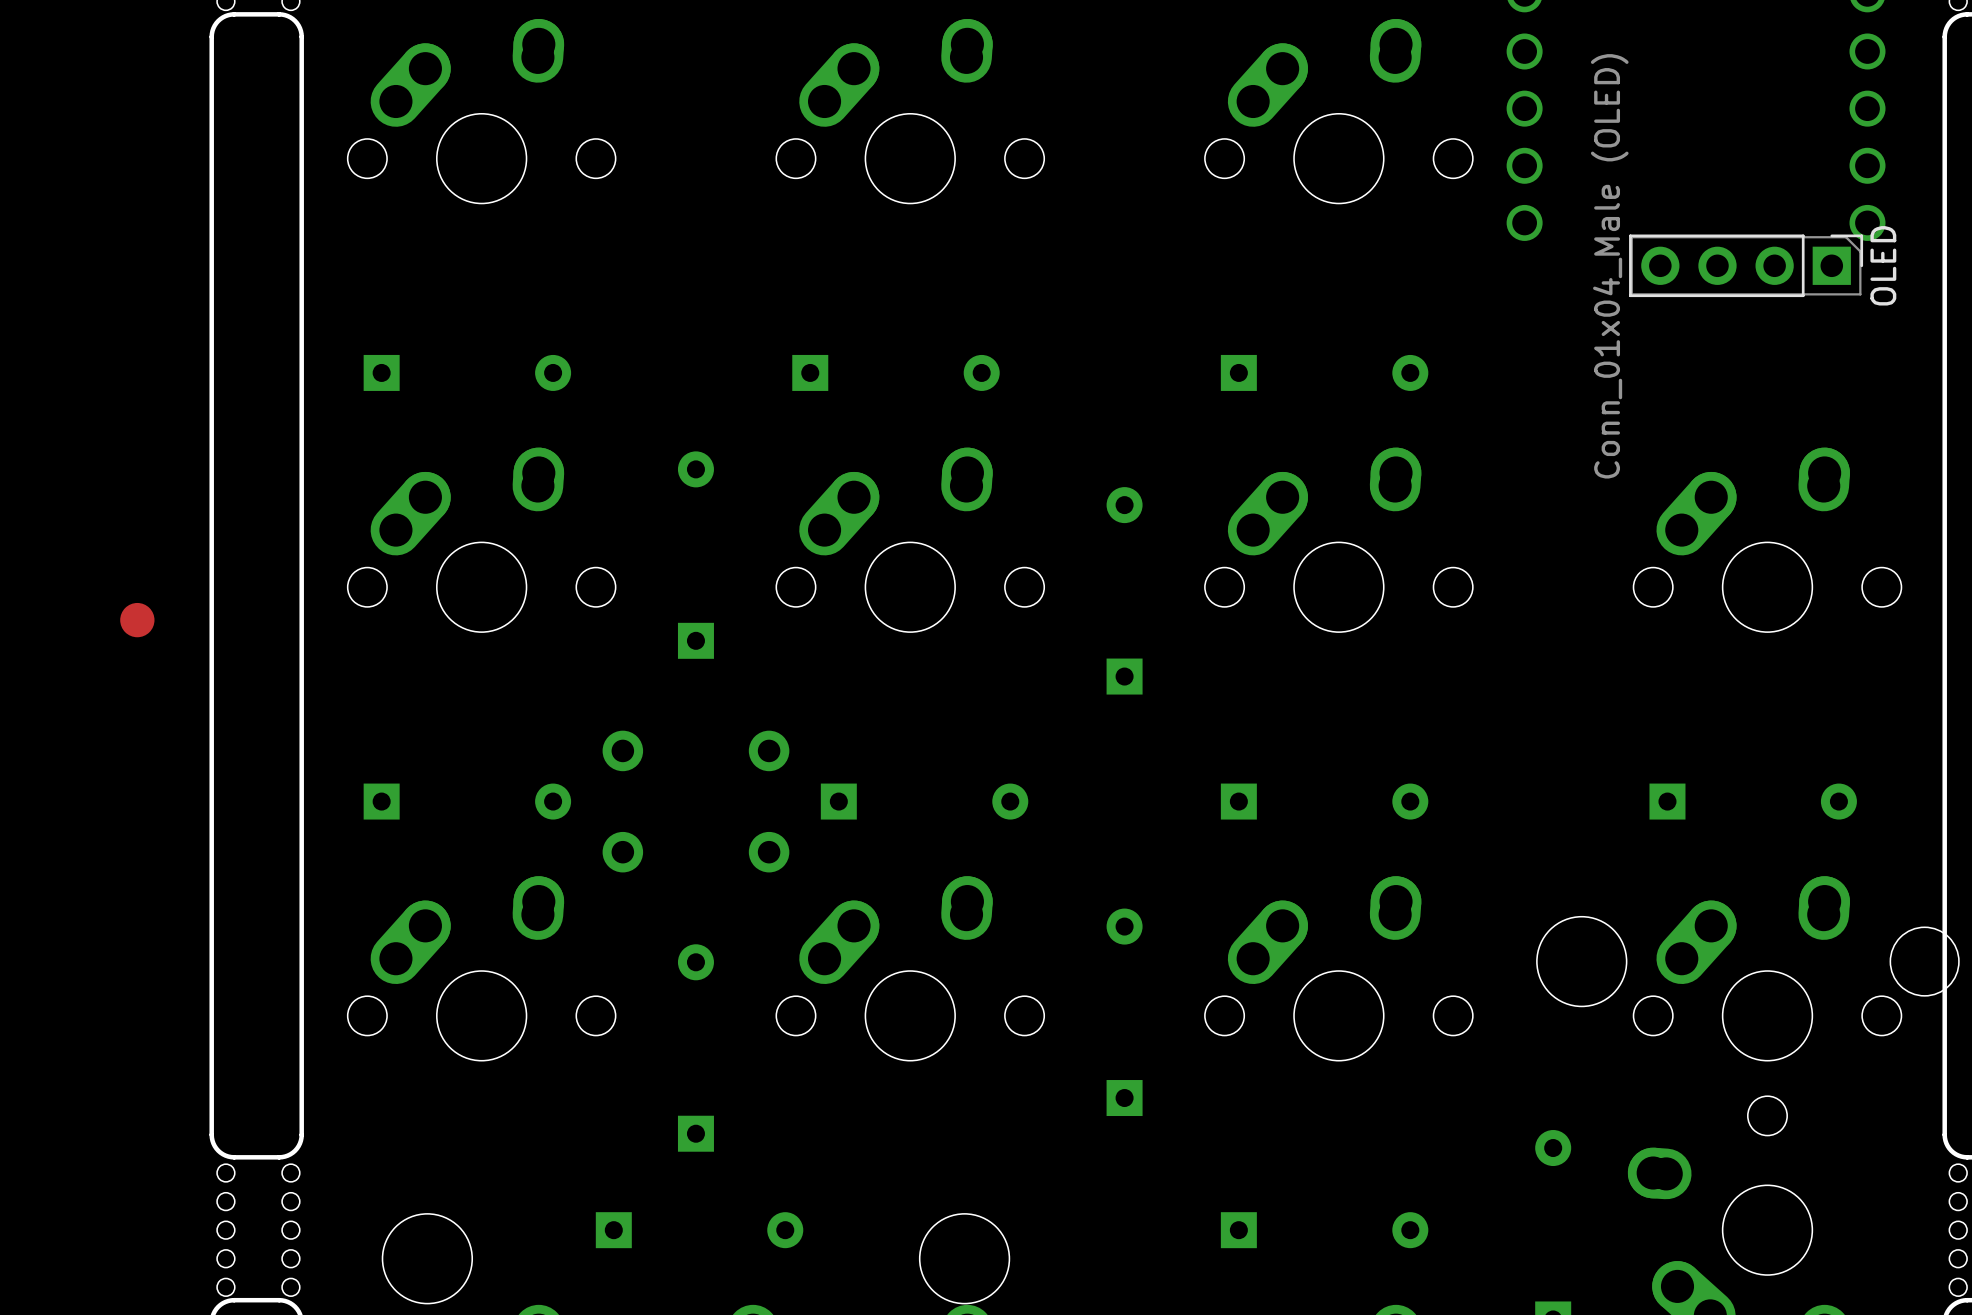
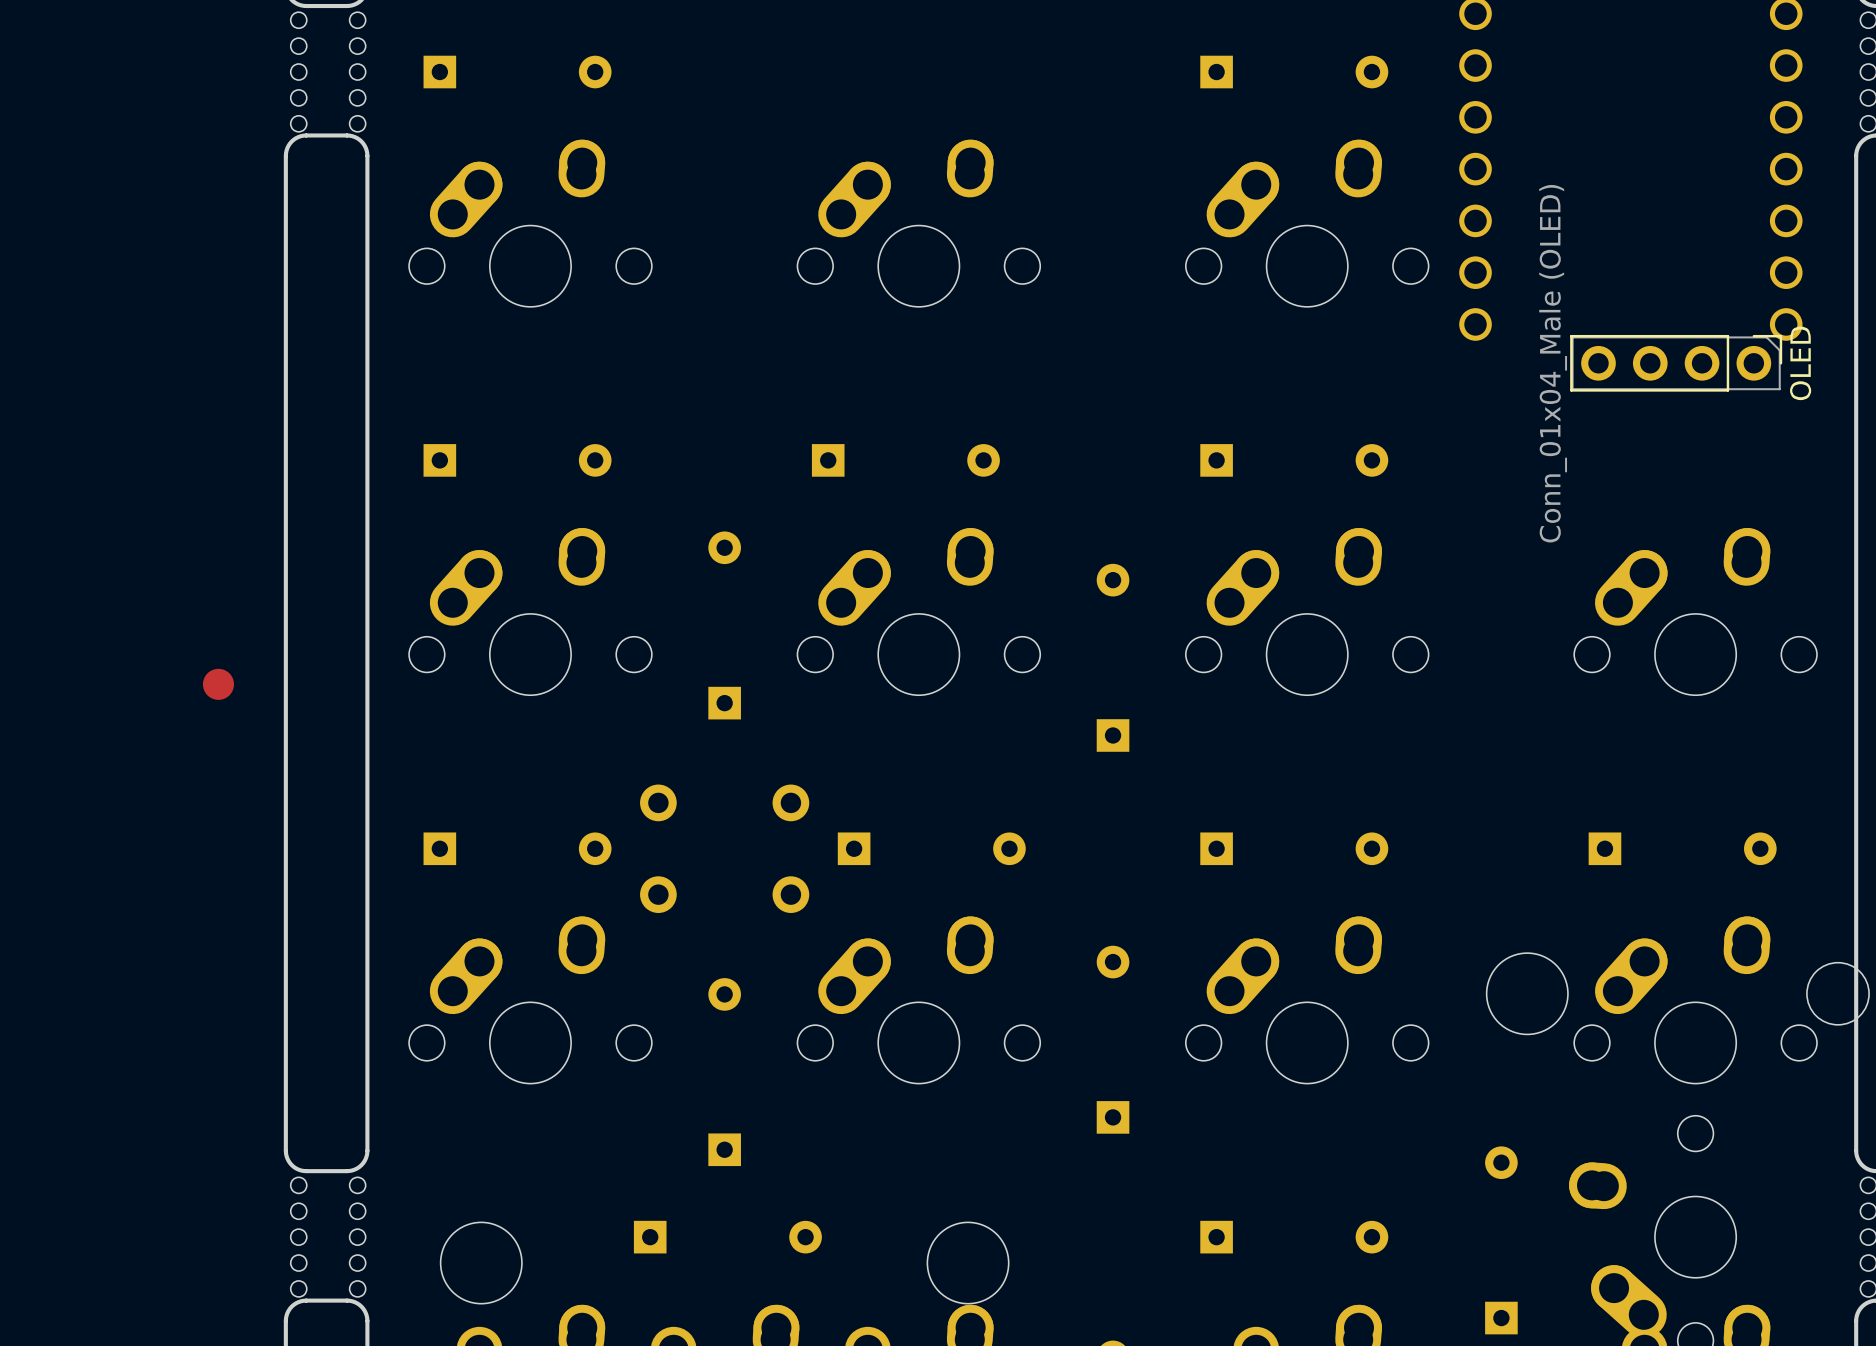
OLED footprint: [1629, 234, 1864, 298] -> [1570, 334, 1783, 392]

